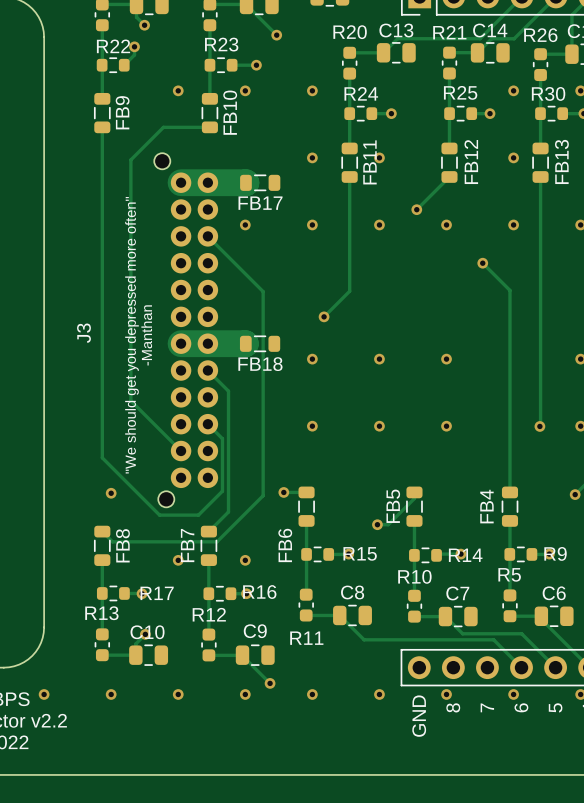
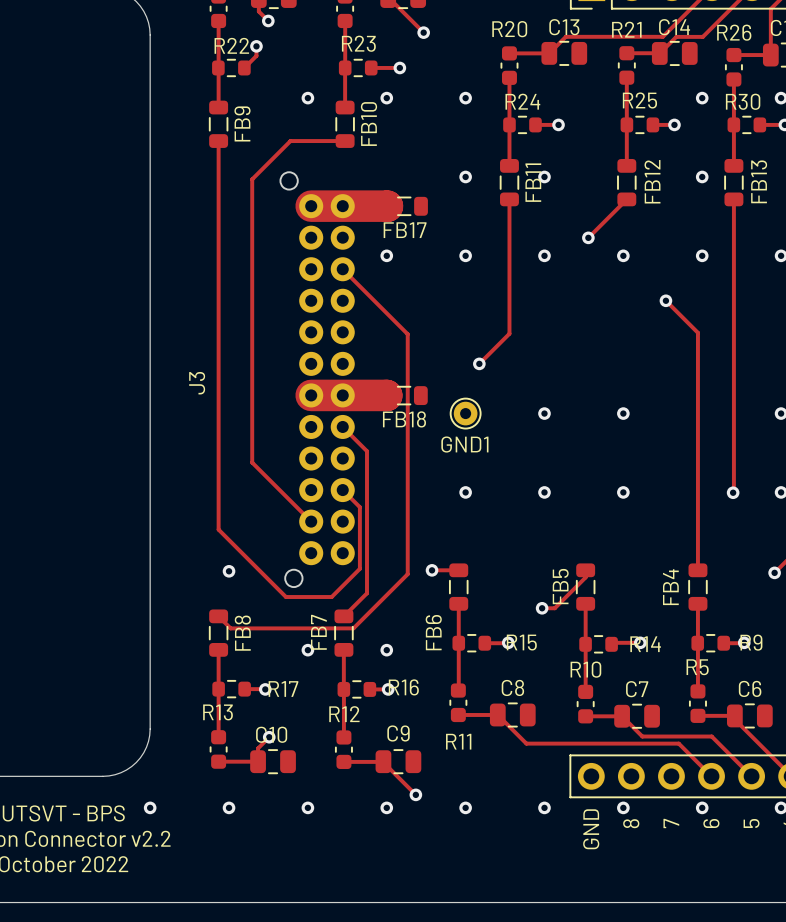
J3 footprint: [154, 153, 219, 508] -> [279, 171, 355, 589]
text: "We should get you depressed more often" (131, 335) -> none
text: -Manthan (146, 335) -> none
GND1: none -> (465, 413)
via: (312, 359) -> none

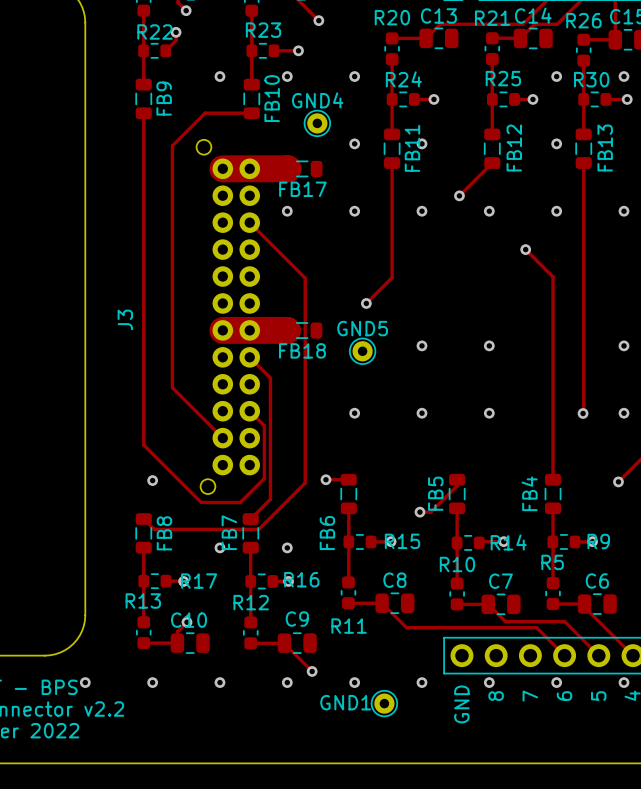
GND4: none -> (317, 123)
GND1 position: (465, 413) -> (384, 703)
GND5: none -> (362, 351)
GND1 name position: GND1 (464, 444) -> GND1 (345, 702)

